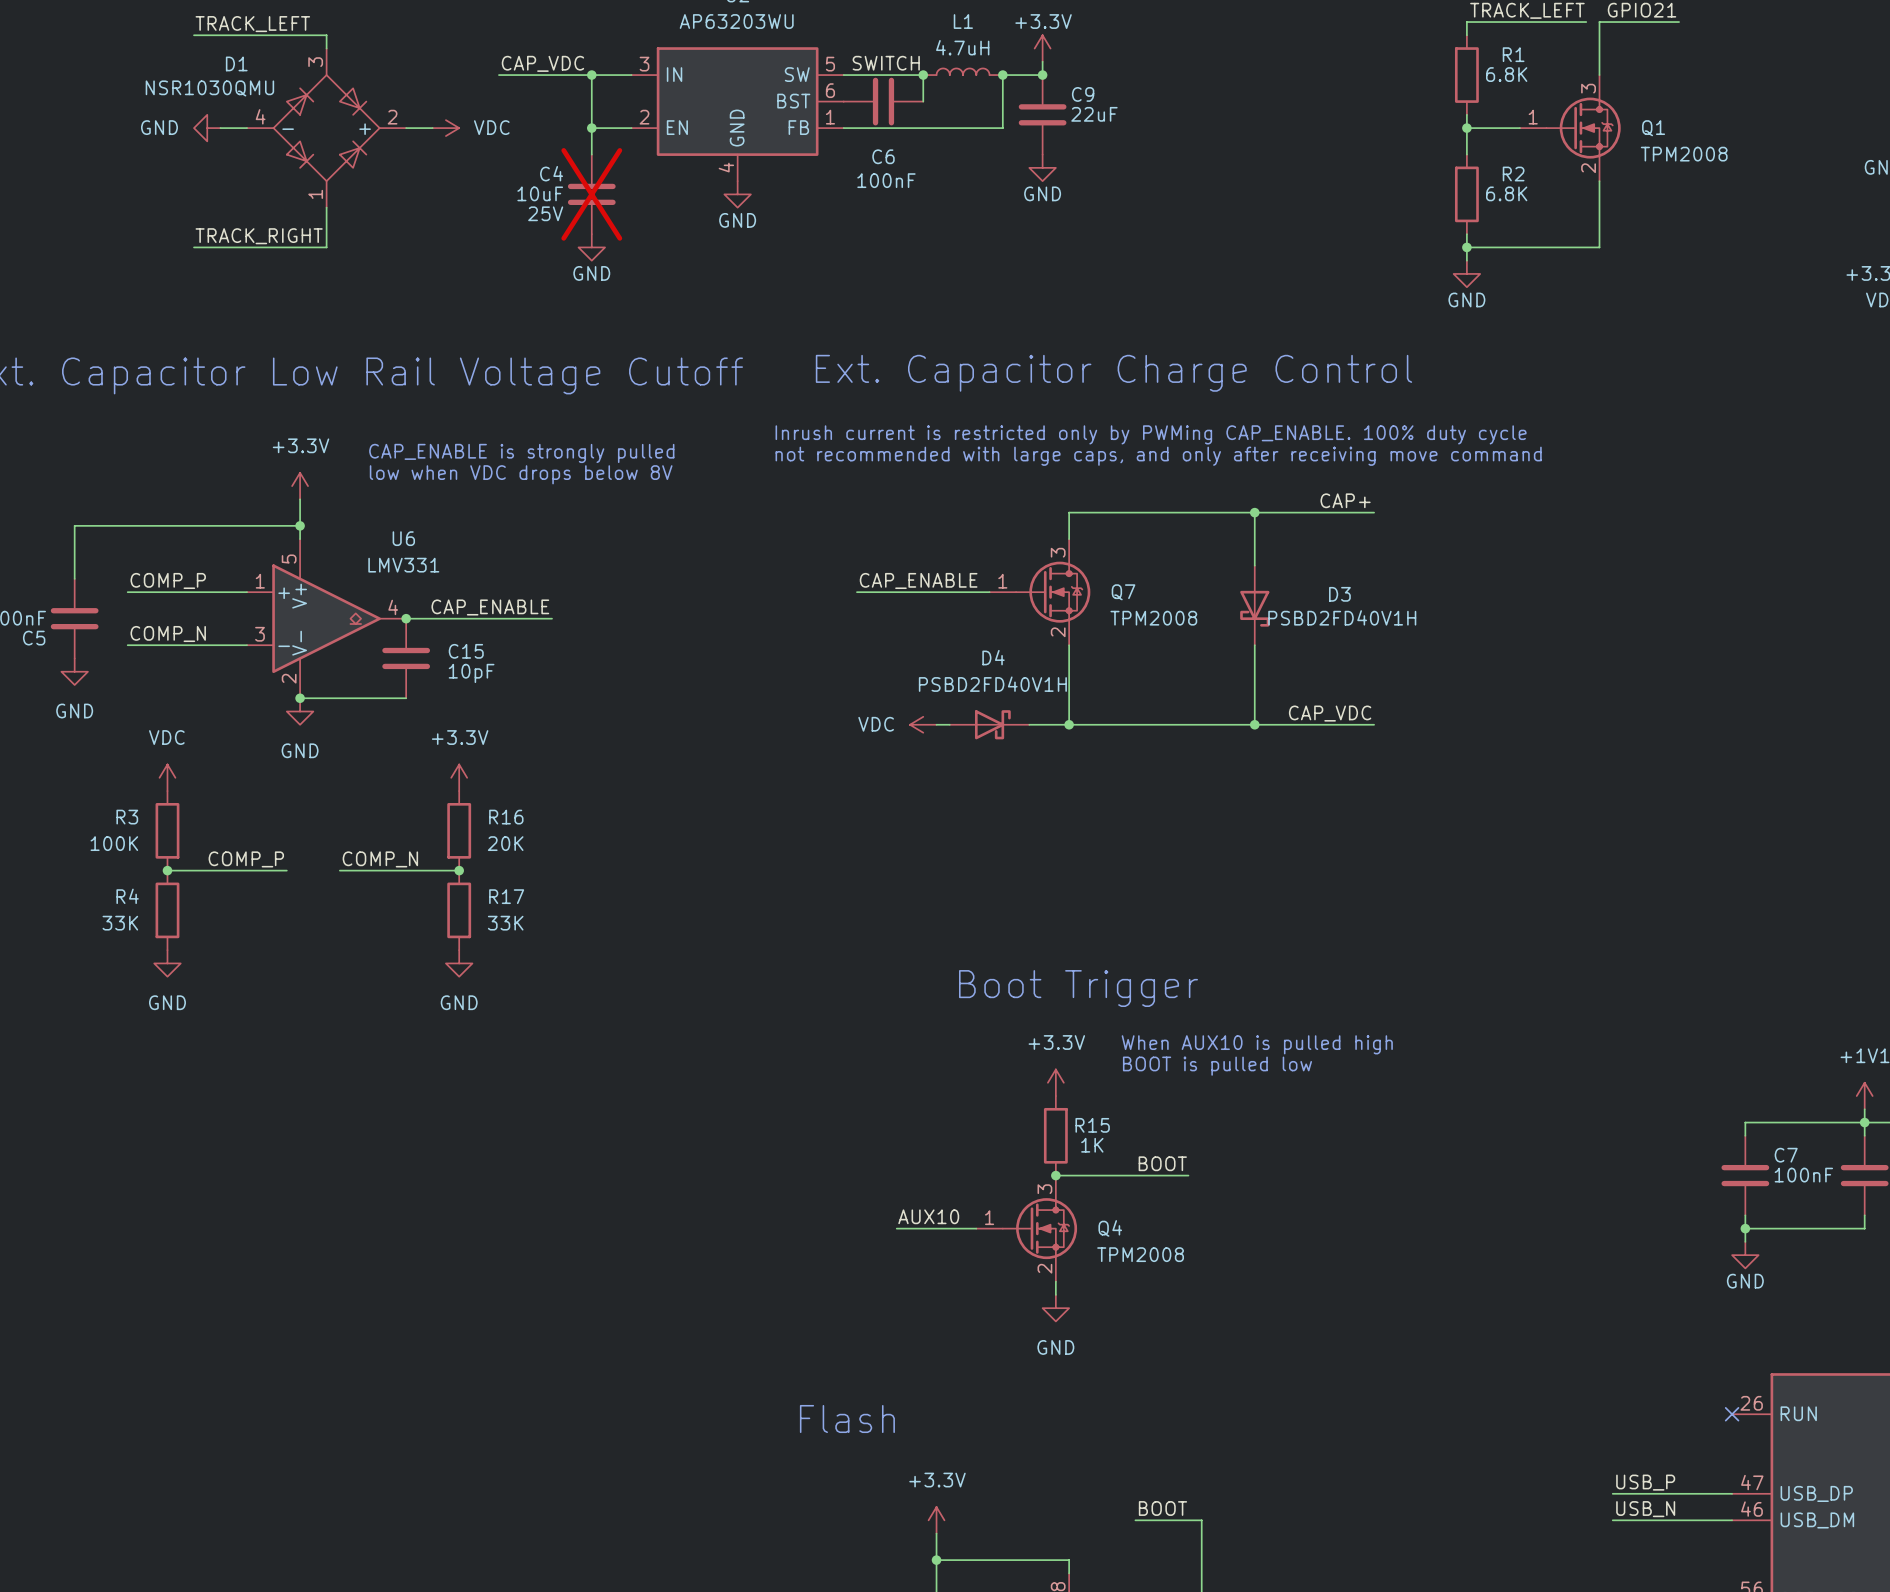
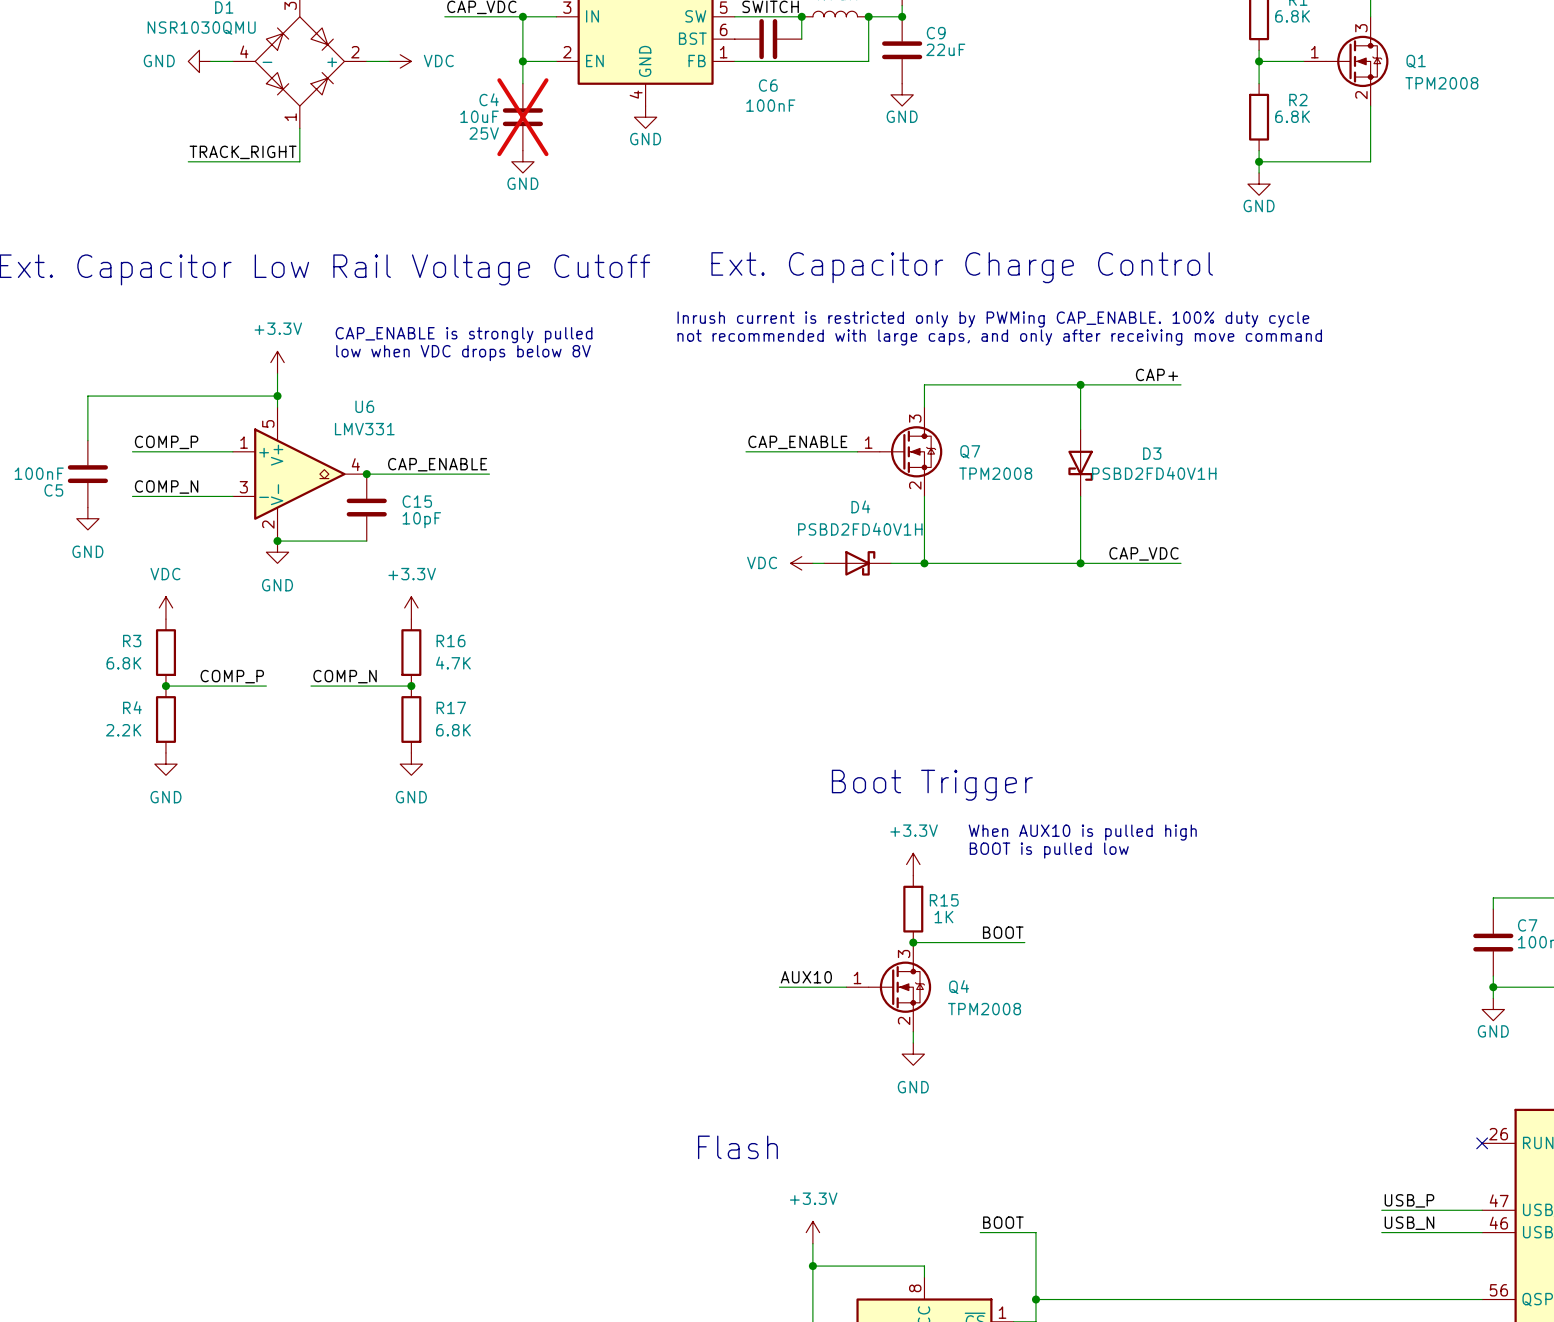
R3 value: 100K (114, 843) -> 6.8K (123, 663)
R16 value: 20K (505, 843) -> 4.7K (453, 663)
R4 value: 33K (120, 923) -> 2.2K (123, 730)
R17 value: 33K (505, 923) -> 6.8K (453, 730)

